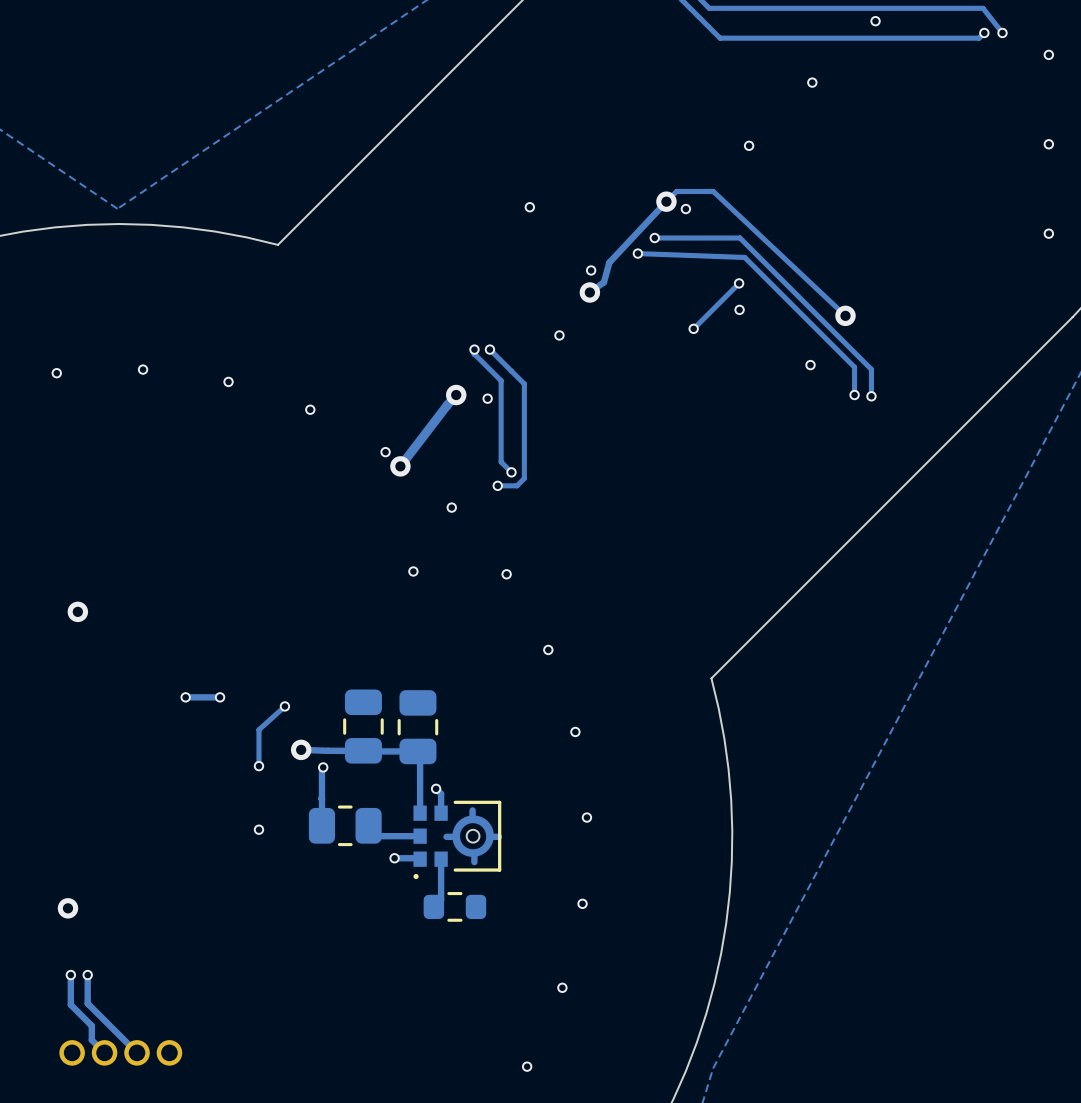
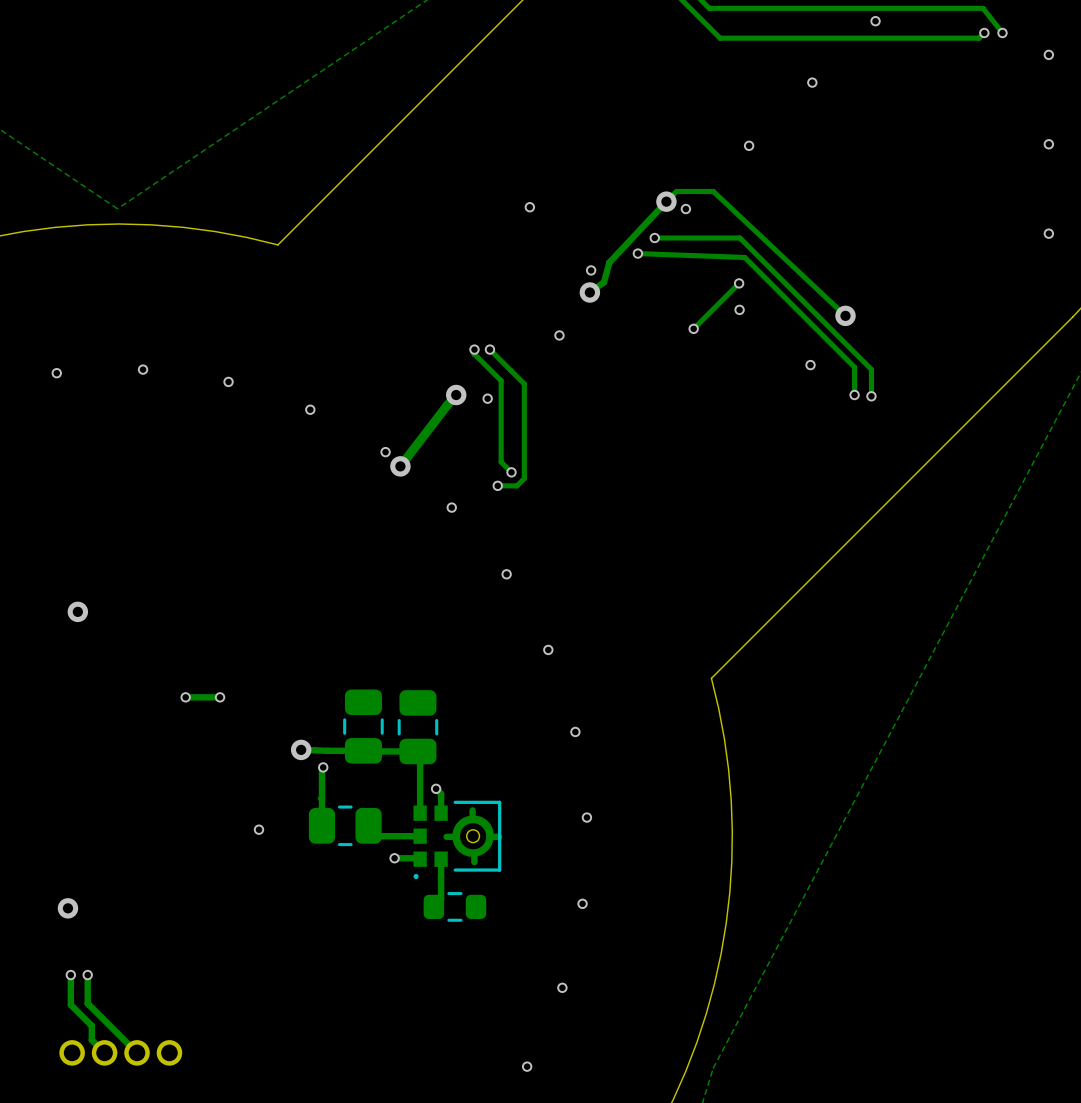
via: (413, 571) -> none
track: (284, 706) (258, 729) (258, 766) -> none
via: (284, 706) -> none
via: (258, 766) -> none

